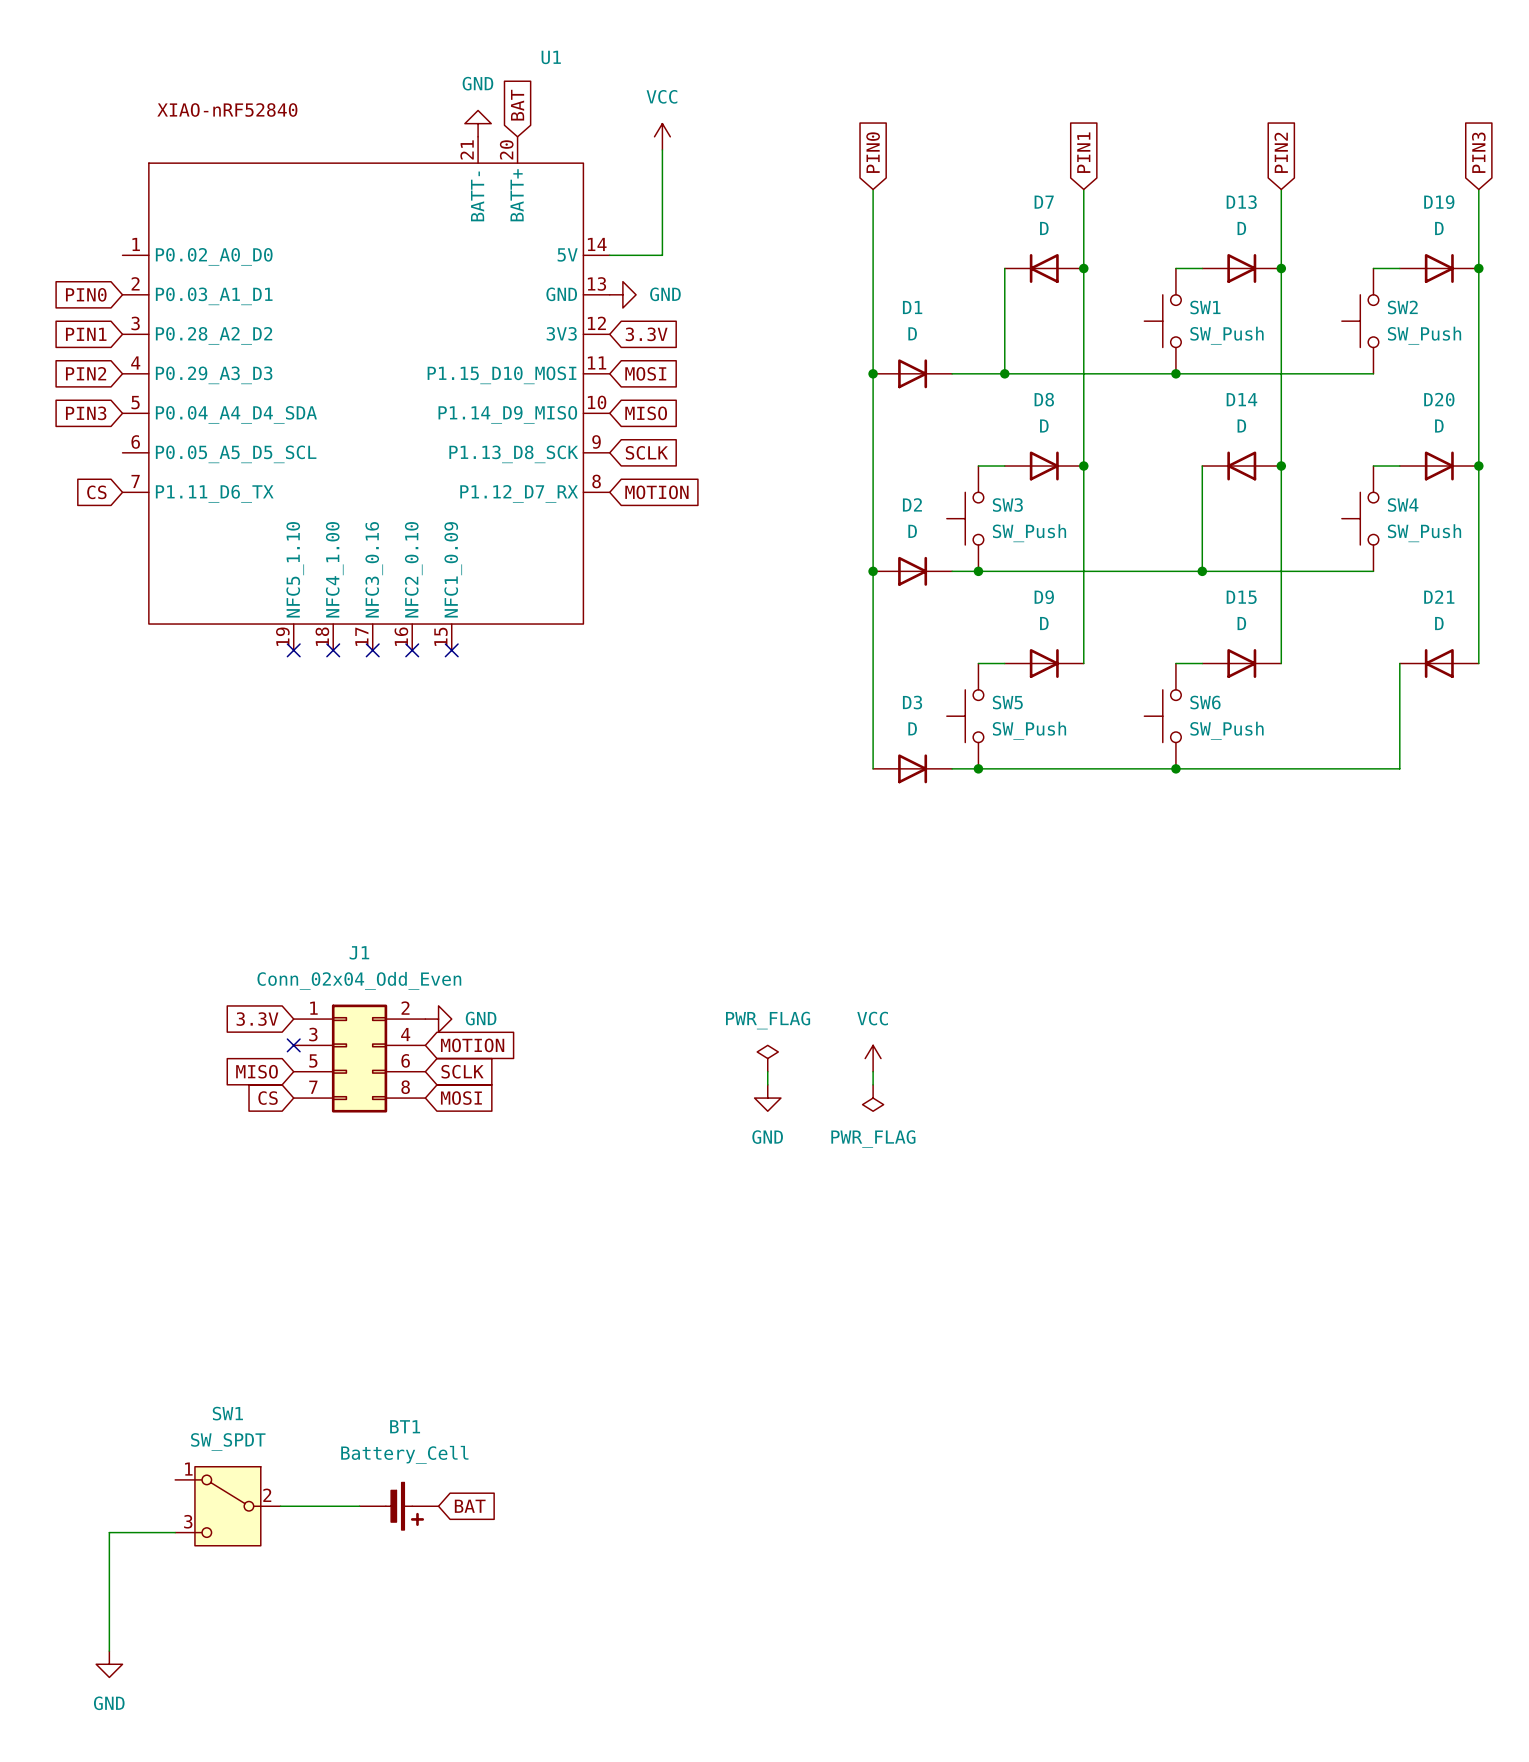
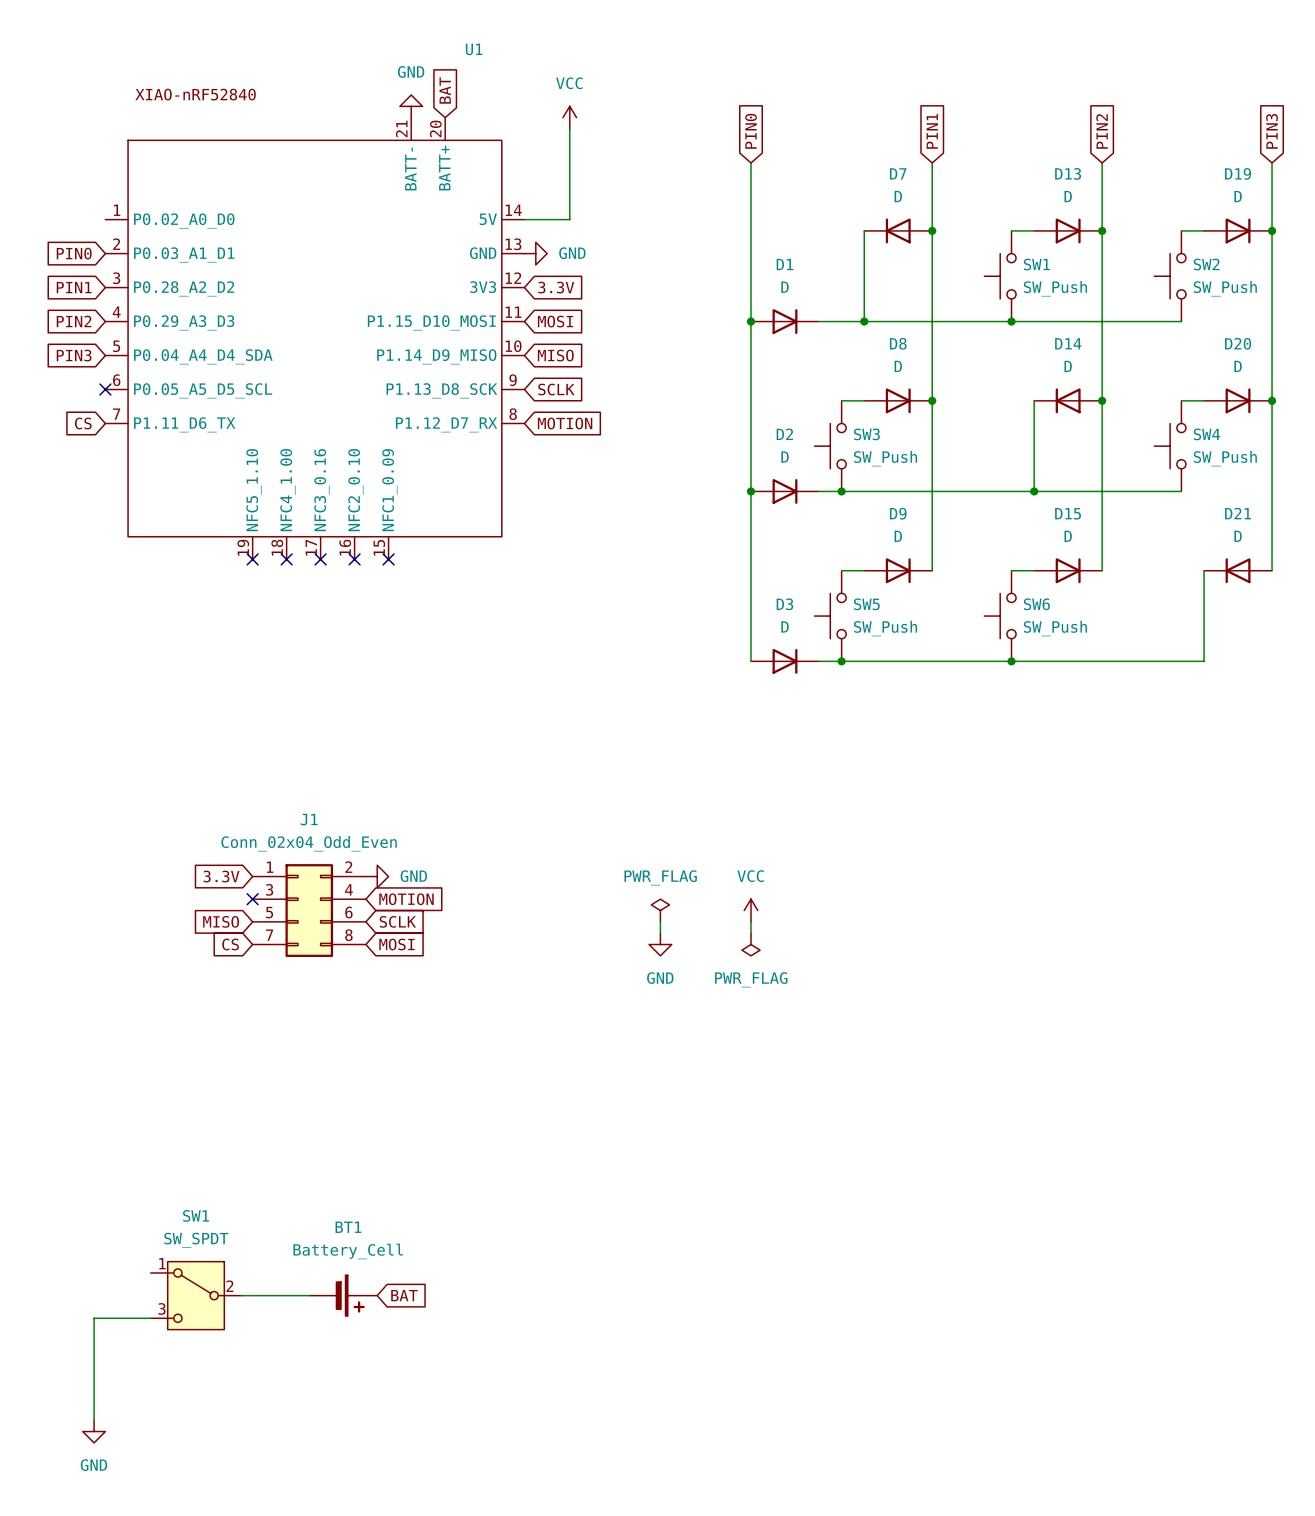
no-connect mark: none -> (105, 389)

